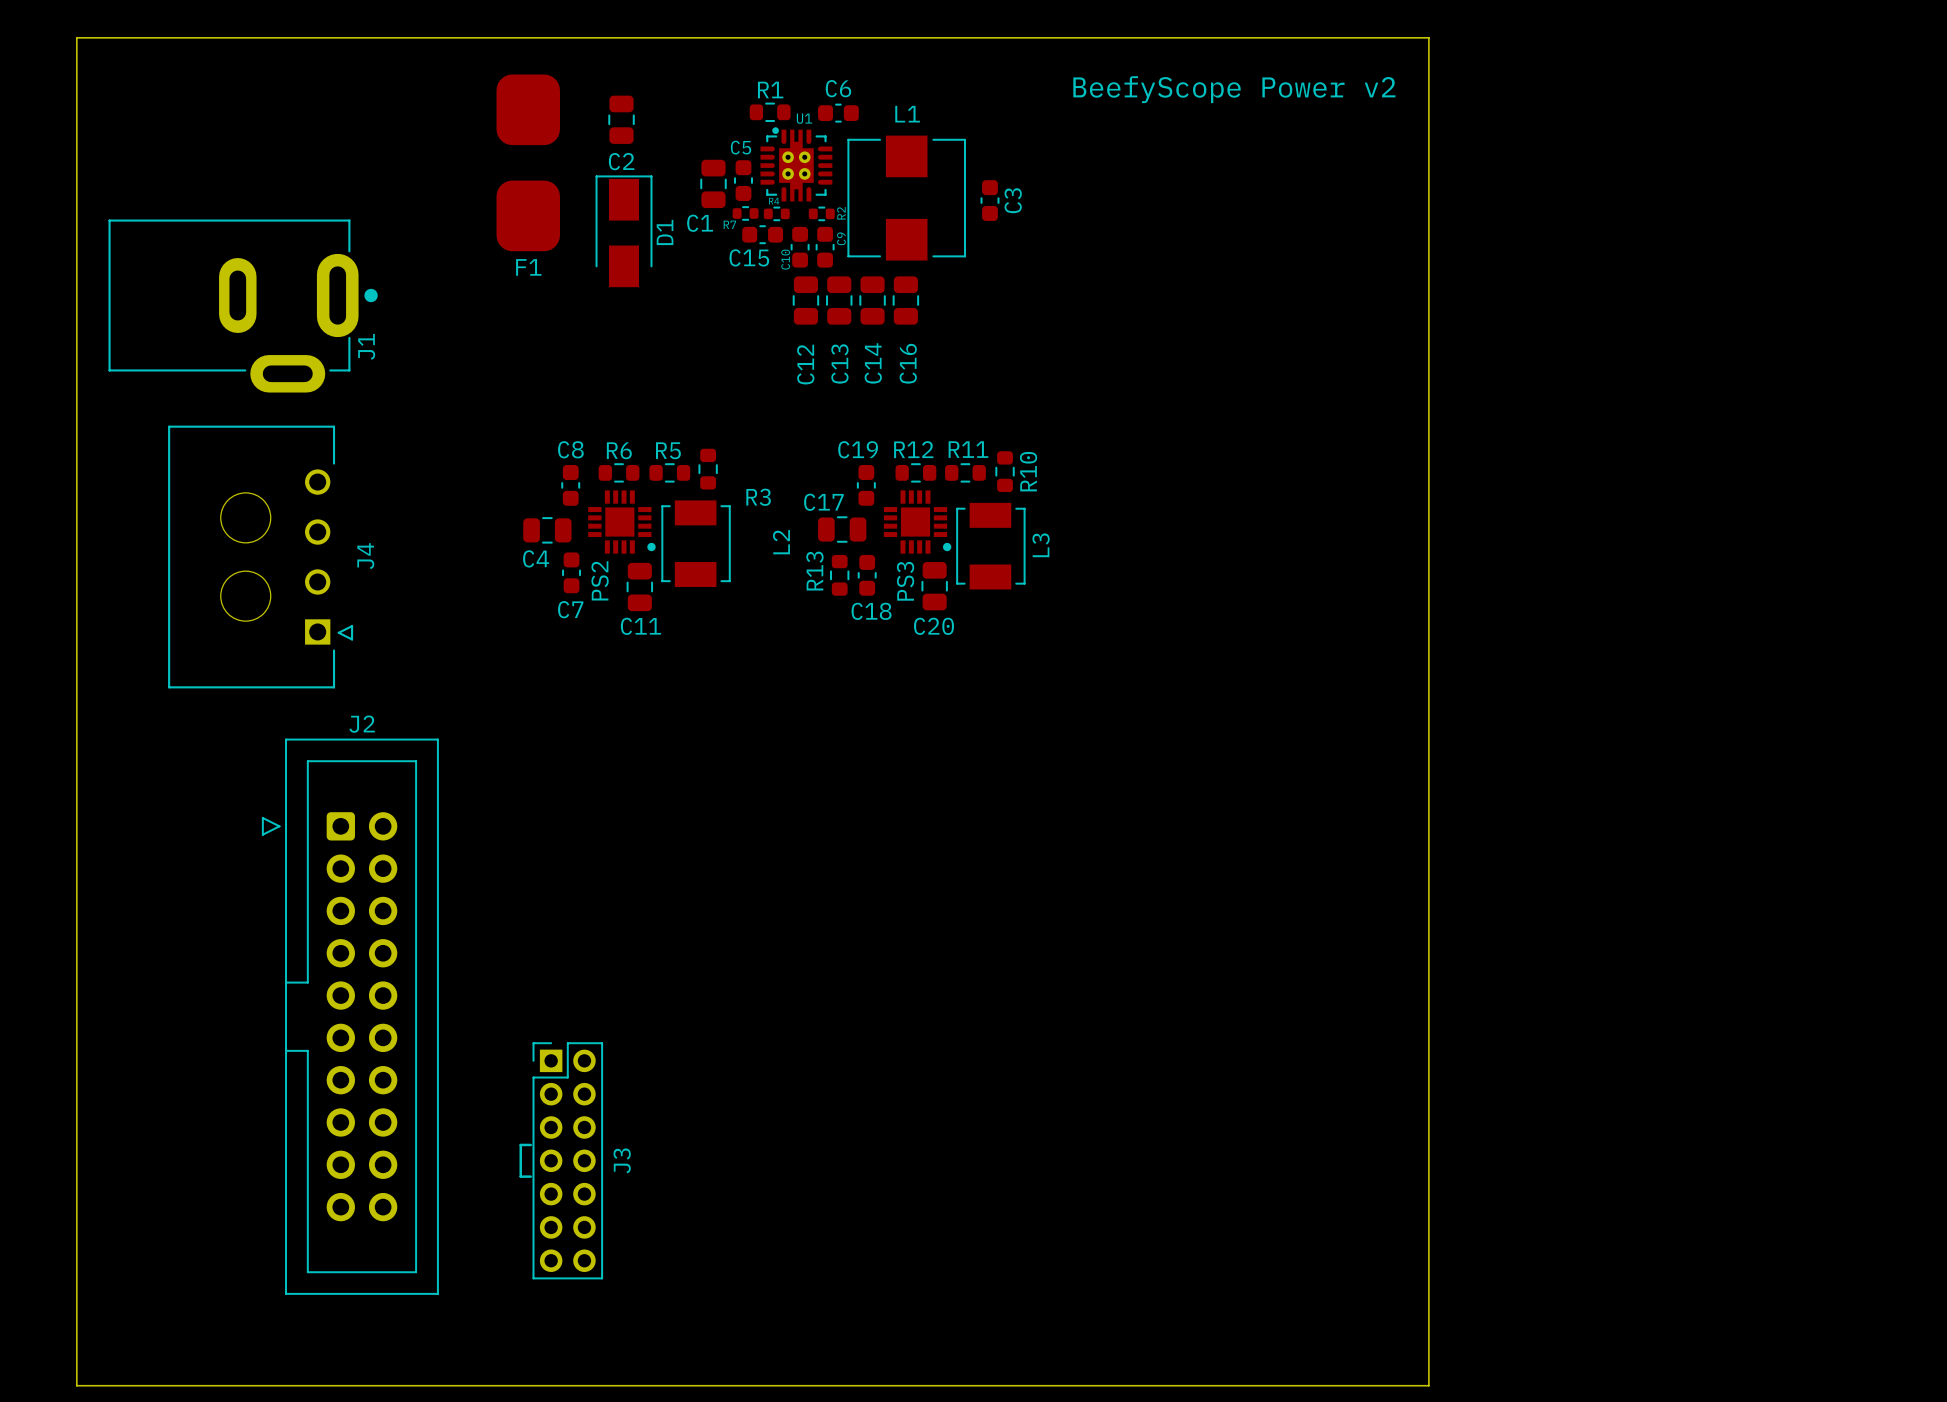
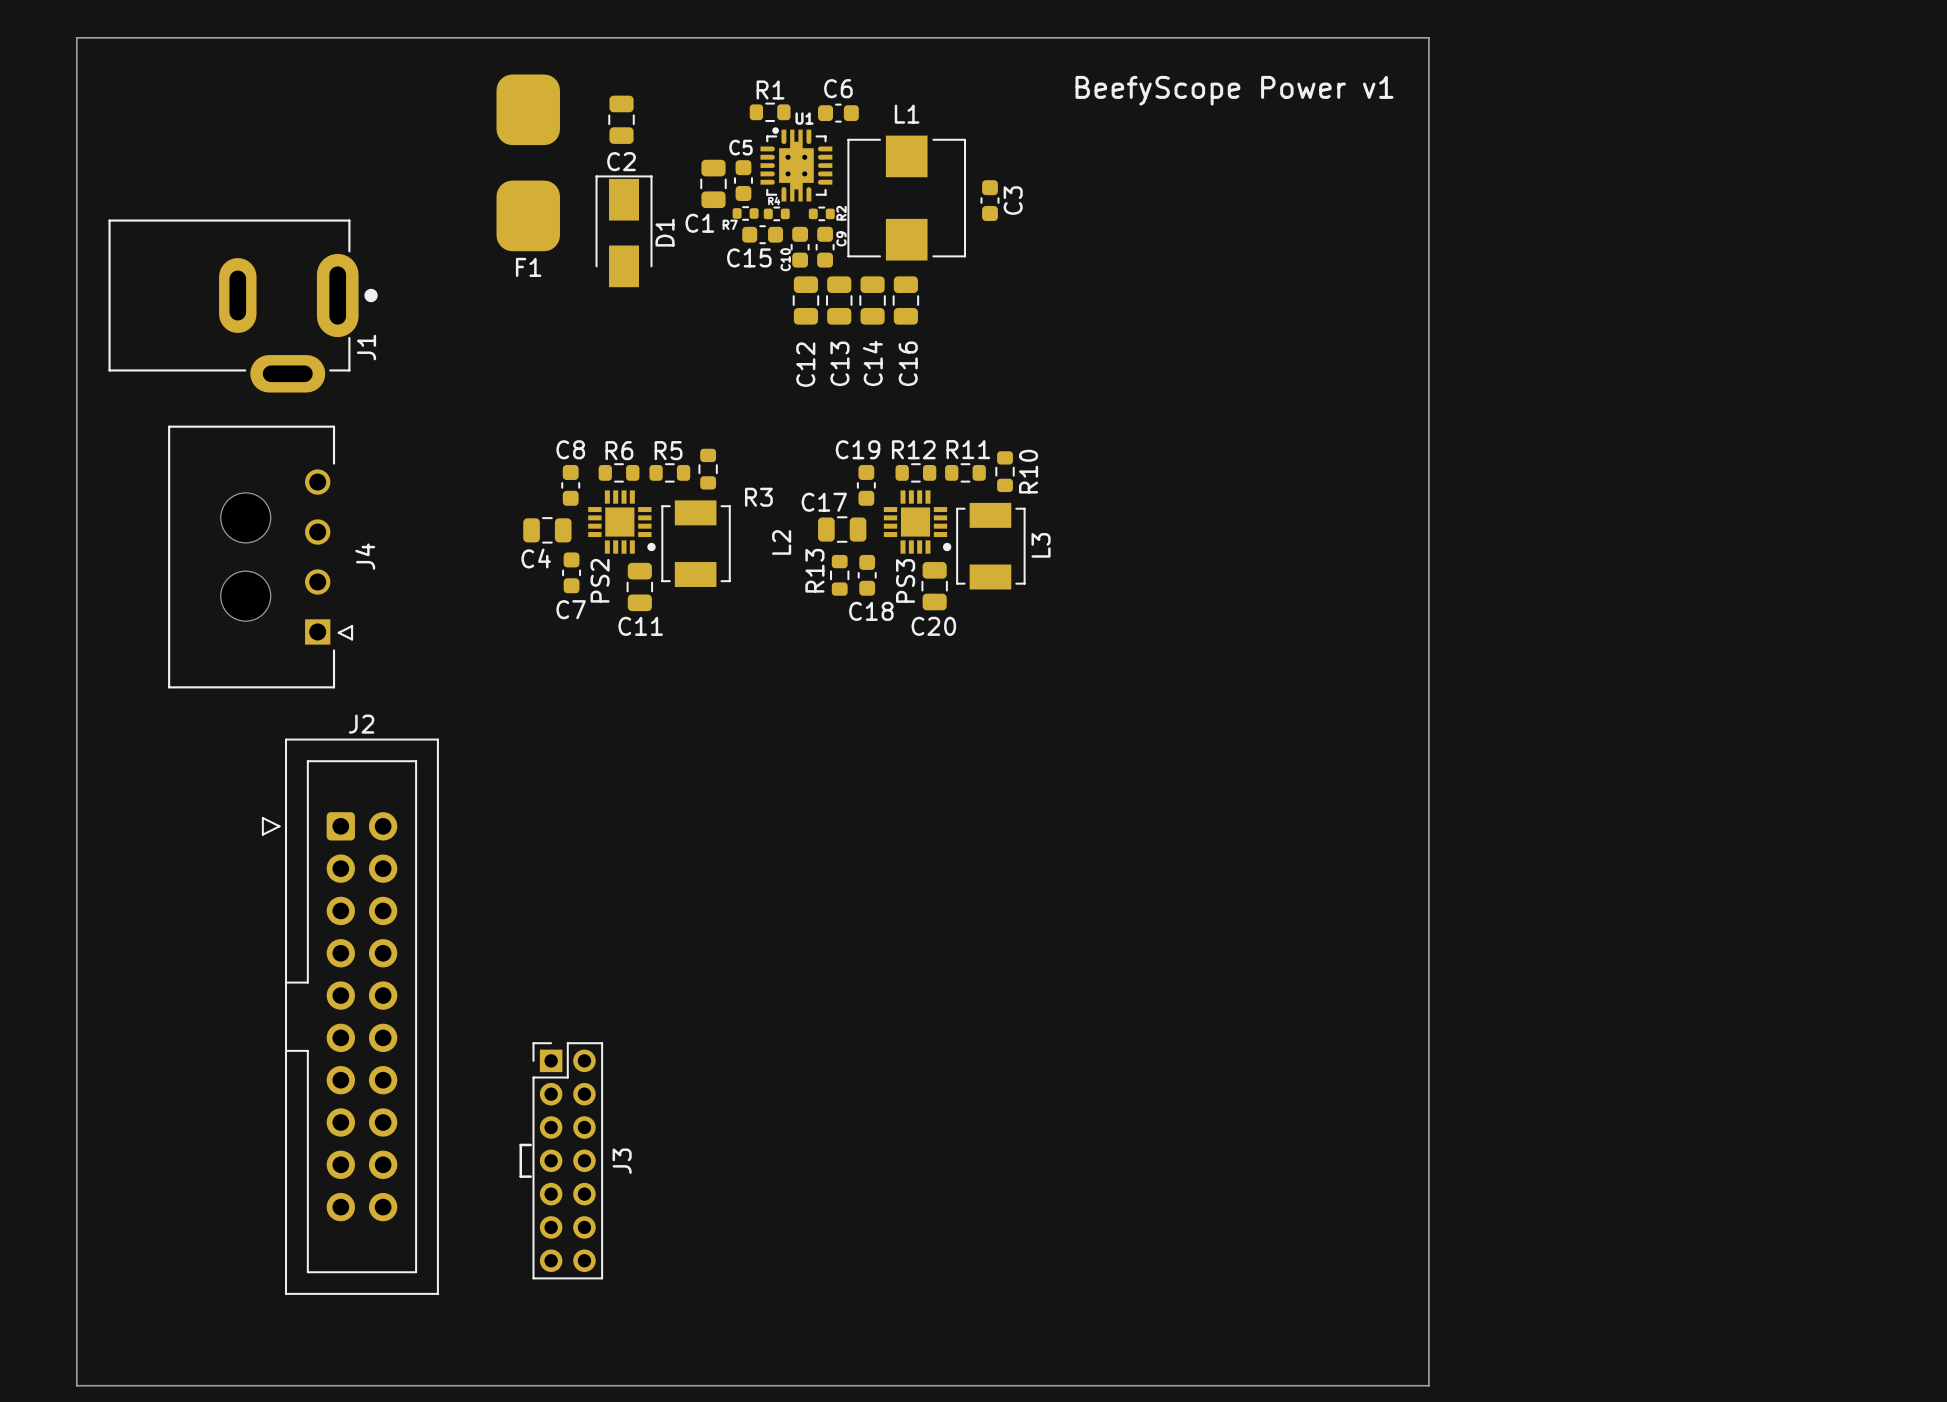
text: BeefyScope Power v2 (1234, 89) -> BeefyScope Power v1 (1234, 90)

